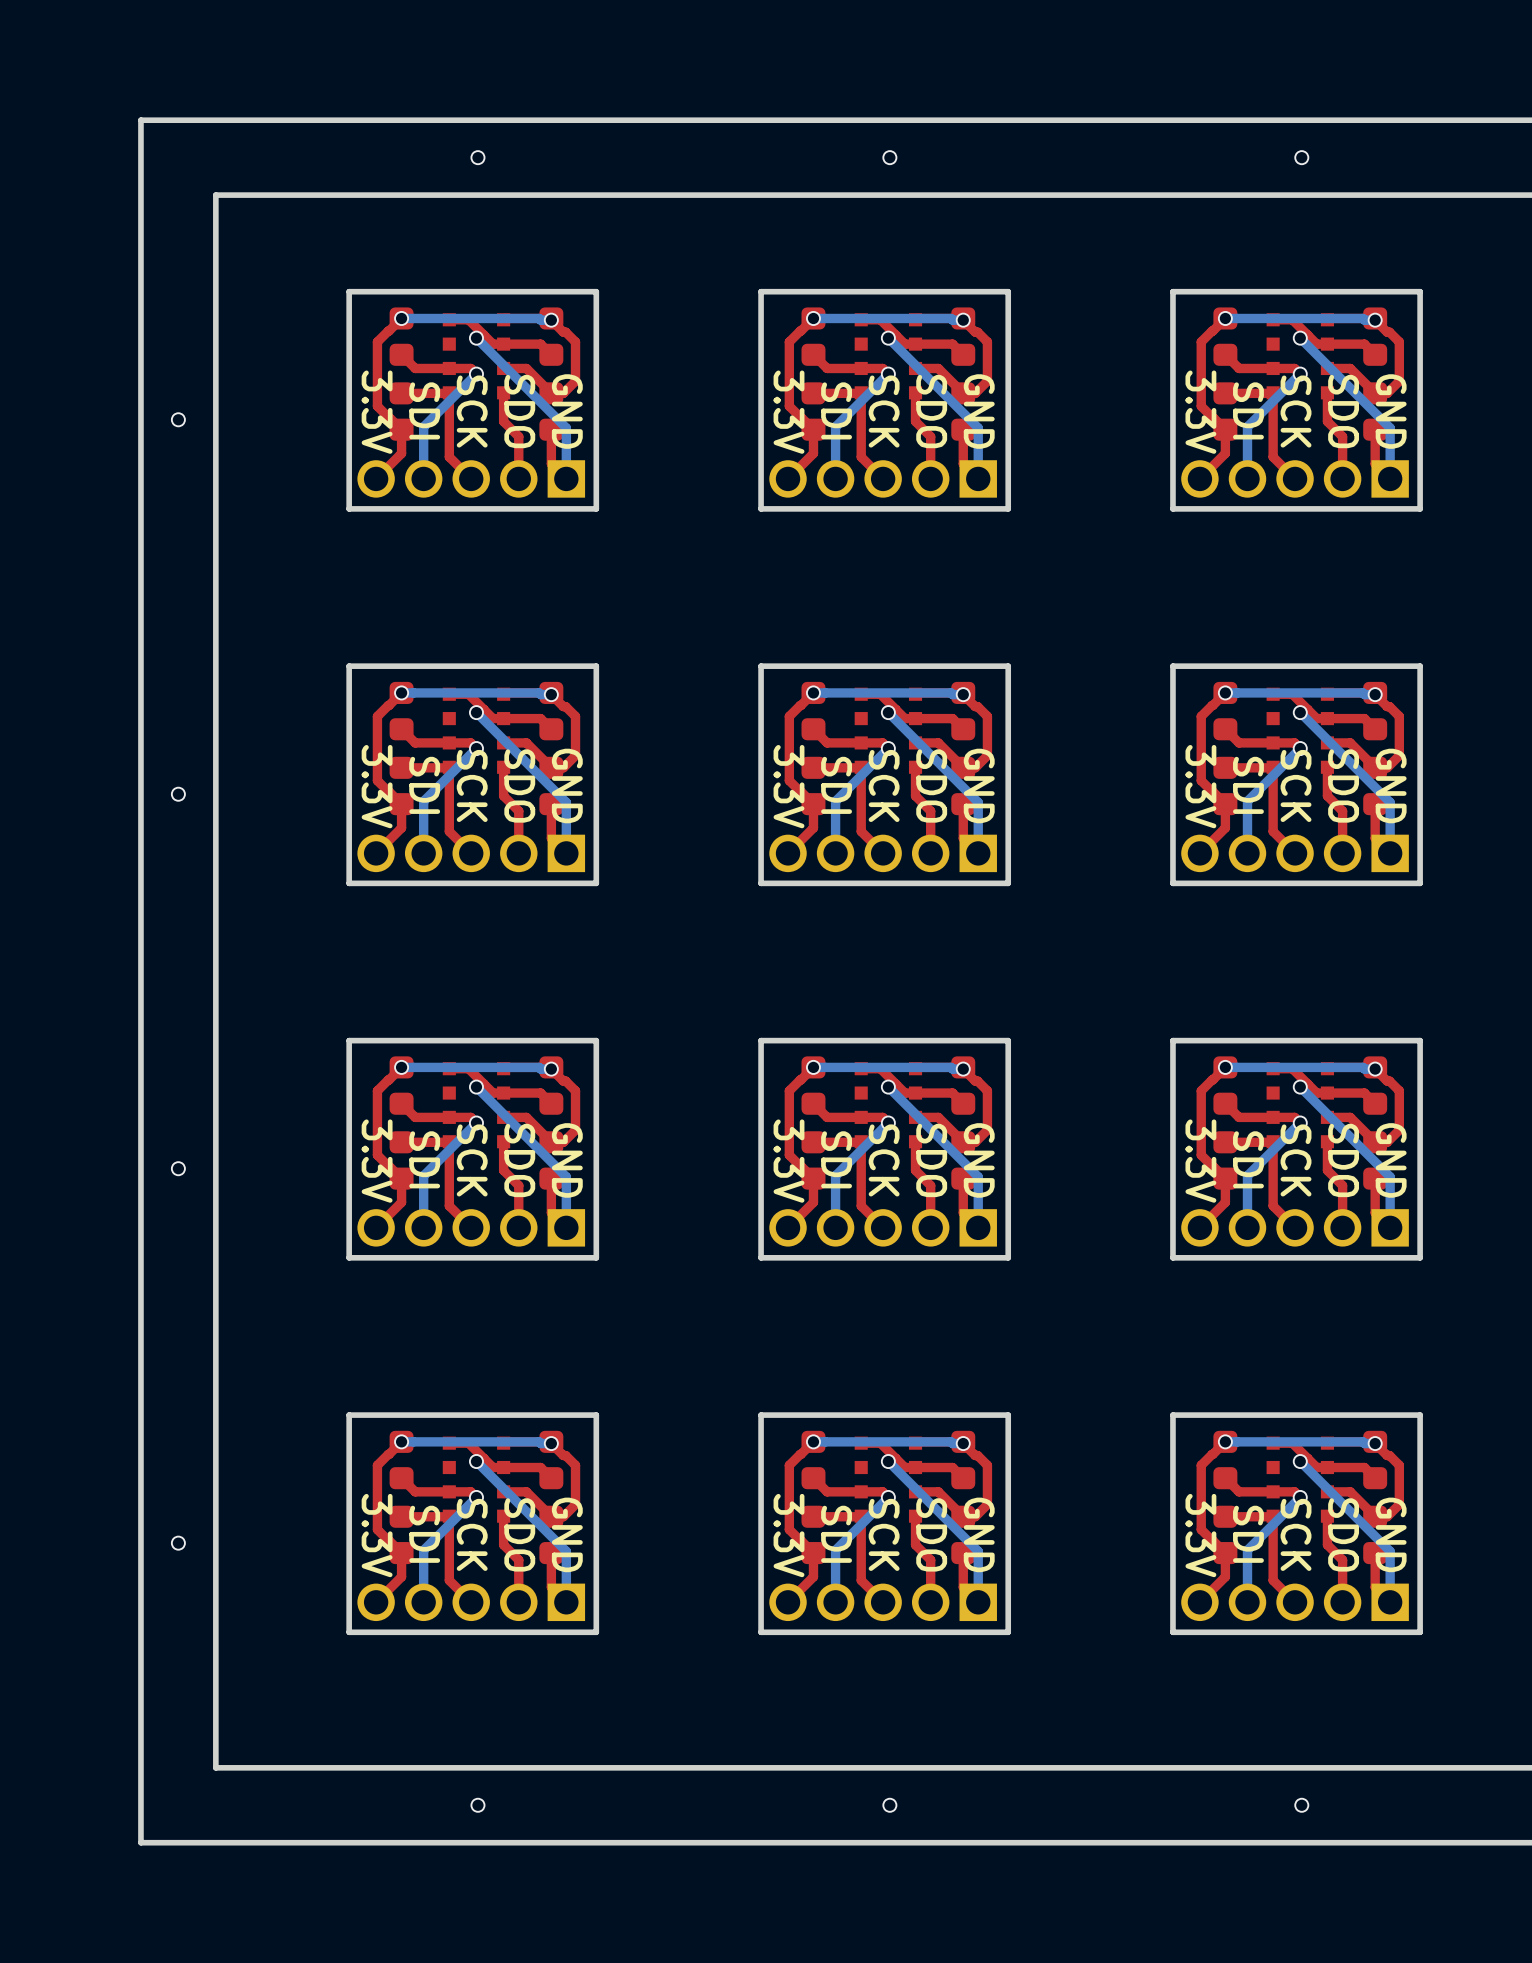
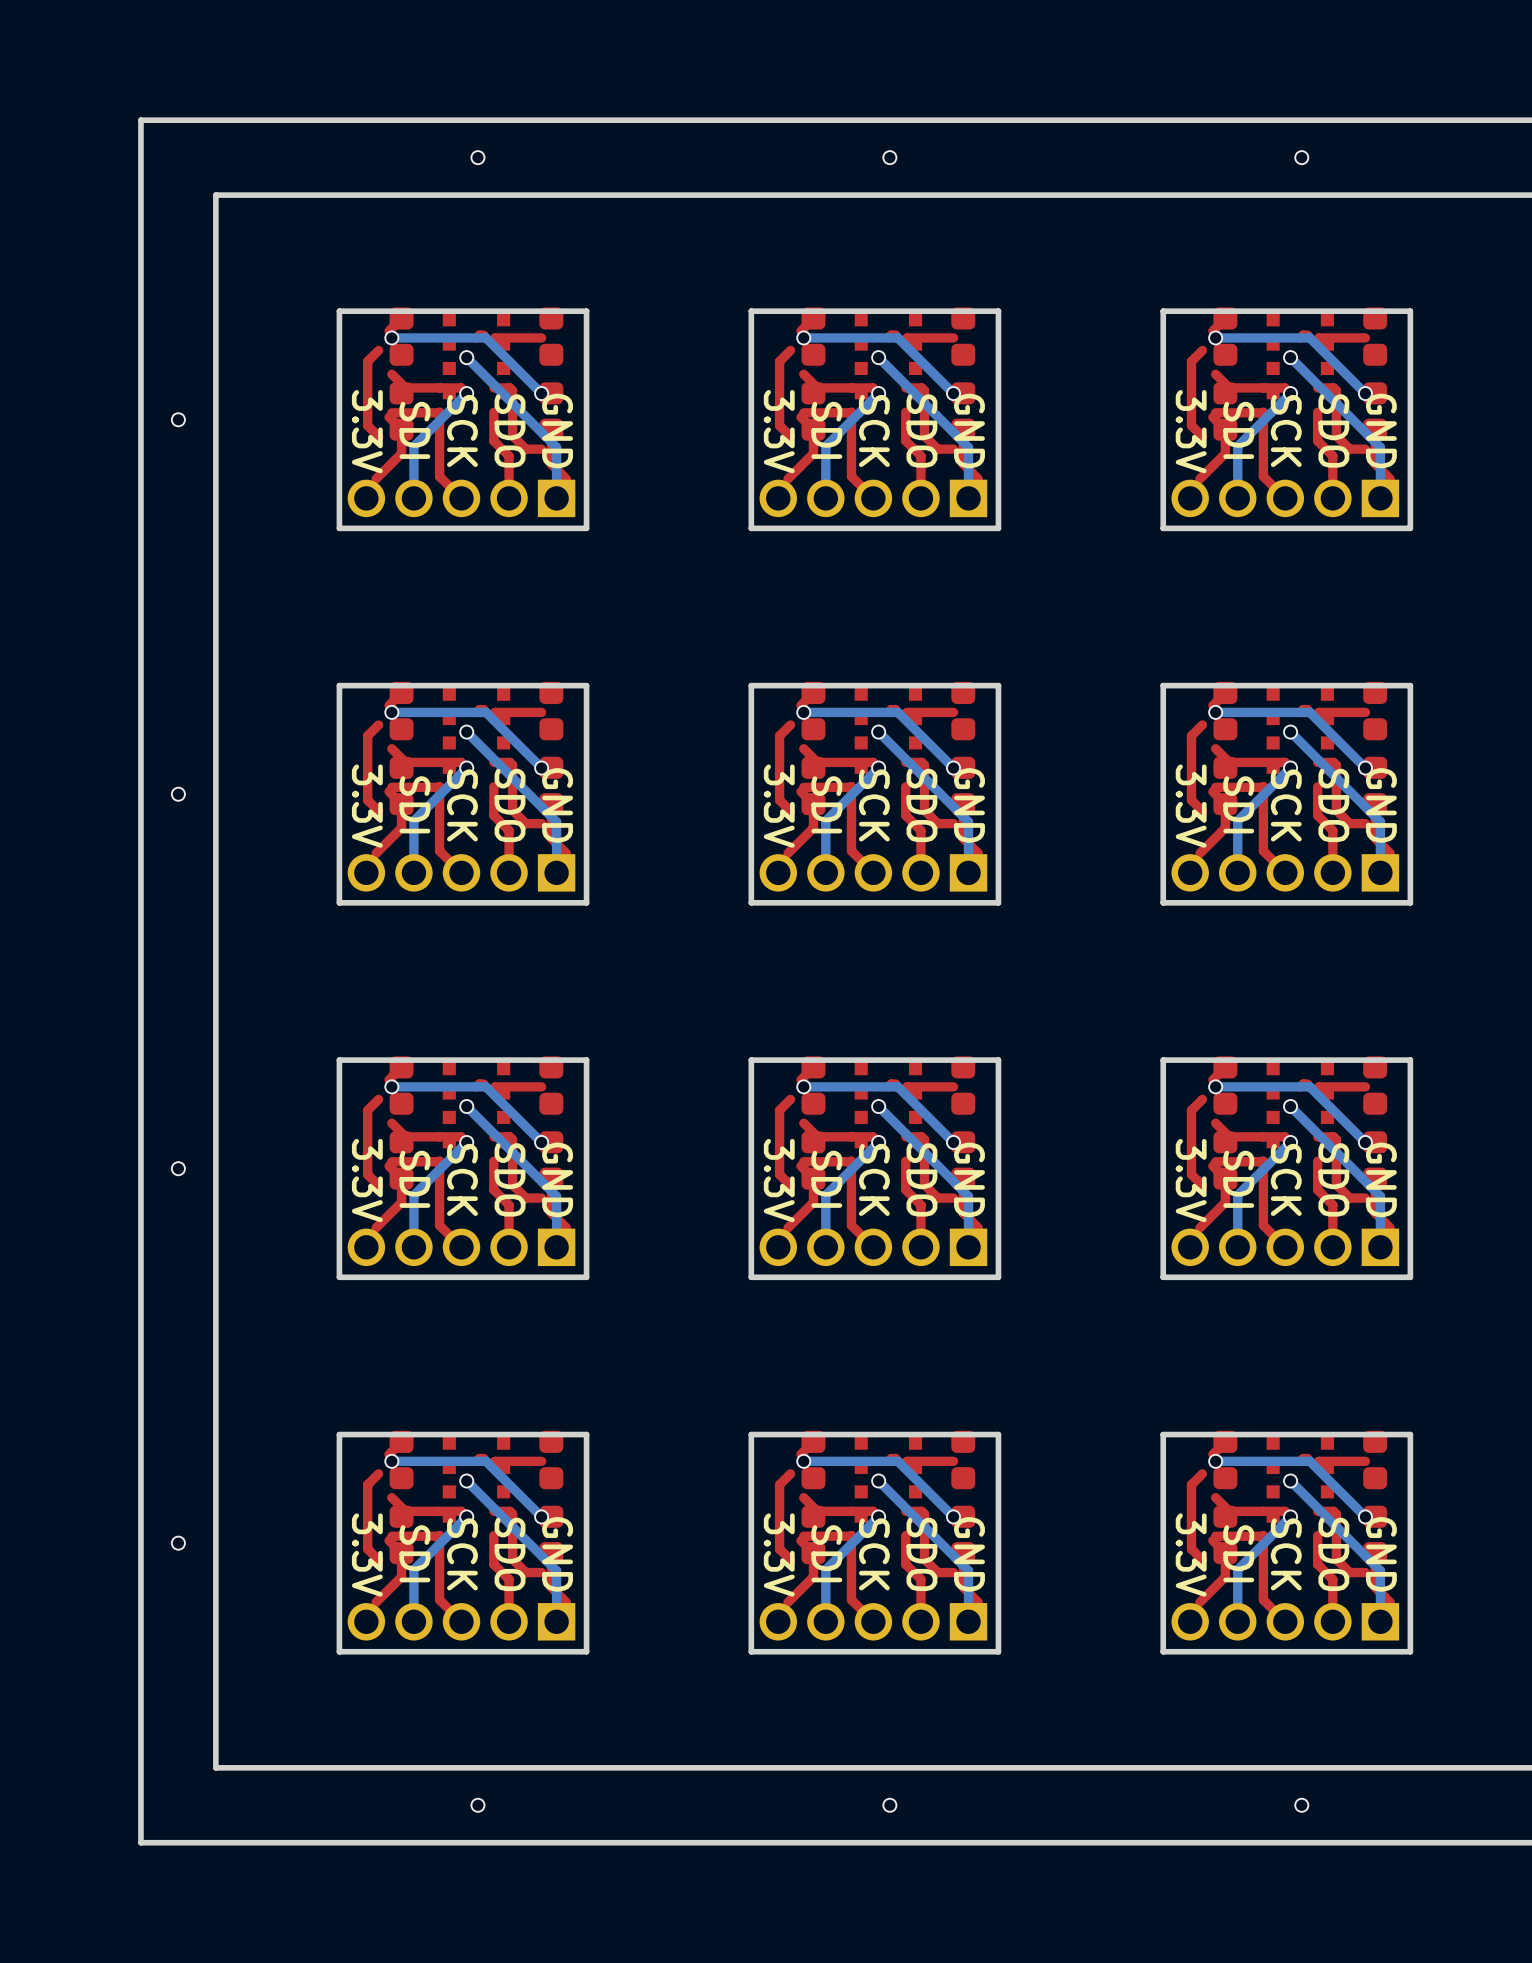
board edge: (596, 291) (349, 291) (349, 508) (596, 508) (596, 291) -> (586, 311) (339, 311) (339, 528) (586, 528) (586, 311)
board edge: (1008, 291) (761, 291) (761, 508) (1008, 508) (1008, 291) -> (998, 311) (751, 311) (751, 528) (998, 528) (998, 311)
board edge: (1420, 291) (1172, 291) (1172, 508) (1420, 508) (1420, 291) -> (1410, 311) (1163, 311) (1163, 528) (1410, 528) (1410, 311)
bottom track: (401, 318) (539, 318) (551, 320) -> none
via position: (401, 318) -> (391, 337)
bottom track: (813, 318) (950, 318) (963, 320) -> none
via position: (813, 318) -> (803, 337)
bottom track: (1225, 318) (1362, 318) (1375, 320) -> none
via position: (1225, 318) -> (1215, 337)
top track: (449, 319) (468, 319) (492, 344) (540, 344) (551, 354) -> none
top track: (503, 319) (551, 318) (575, 341) (575, 381) (563, 393) (551, 393) (526, 368) (503, 368) -> none
top track: (861, 319) (880, 319) (904, 344) (952, 344) (963, 354) -> none
top track: (915, 319) (963, 318) (987, 341) (987, 381) (975, 393) (963, 393) (938, 368) (915, 368) -> none
top track: (1273, 319) (1292, 319) (1316, 344) (1364, 344) (1375, 354) -> none
top track: (1327, 319) (1375, 318) (1399, 341) (1399, 381) (1387, 393) (1375, 393) (1350, 368) (1327, 368) -> none
via: (551, 320) -> none
via: (963, 320) -> none
via: (1375, 320) -> none
top track: (388, 330) (377, 341) (377, 406) (388, 417) -> (378, 350) (367, 361) (367, 425) (378, 436)
top track: (800, 330) (789, 341) (789, 406) (800, 417) -> (790, 350) (779, 361) (779, 425) (790, 436)
top track: (1212, 330) (1201, 341) (1201, 406) (1212, 417) -> (1202, 350) (1191, 361) (1191, 425) (1202, 436)
bottom track: none -> (391, 337) (486, 337) (541, 393)
top track: none -> (541, 337) (493, 339)
bottom track: none -> (803, 337) (897, 337) (953, 393)
top track: none -> (953, 337) (905, 339)
bottom track: none -> (1215, 337) (1309, 337) (1365, 393)
top track: none -> (1365, 337) (1317, 339)
bottom track: (476, 338) (566, 428) (566, 478) -> (466, 357) (556, 447) (556, 498)
via: (476, 338) -> none
bottom track: (888, 338) (978, 428) (978, 478) -> (878, 357) (968, 447) (968, 498)
via: (888, 338) -> none
bottom track: (1300, 338) (1390, 428) (1390, 478) -> (1290, 357) (1380, 447) (1380, 498)
via: (1300, 338) -> none
top track: (401, 354) (415, 368) (470, 368) (476, 374) -> (391, 374) (405, 387) (461, 387) (466, 393)
top track: (813, 354) (827, 368) (882, 368) (888, 374) -> (803, 374) (817, 387) (873, 387) (878, 393)
top track: (1225, 354) (1239, 368) (1294, 368) (1300, 374) -> (1215, 374) (1229, 387) (1284, 387) (1290, 393)
via: none -> (466, 357)
via: none -> (878, 357)
via: none -> (1290, 357)
bottom track: (476, 374) (423, 426) (423, 478) -> (466, 393) (413, 446) (413, 498)
via: (476, 374) -> none
bottom track: (888, 374) (835, 426) (835, 478) -> (878, 393) (825, 446) (825, 498)
via: (888, 374) -> none
bottom track: (1300, 374) (1247, 426) (1247, 478) -> (1290, 393) (1237, 446) (1237, 498)
via: (1300, 374) -> none
top track: none -> (493, 387) (509, 387) (512, 390) (512, 435) (525, 449) (541, 449)
top track: none -> (905, 387) (921, 387) (924, 390) (924, 435) (937, 449) (953, 449)
top track: none -> (1317, 387) (1333, 387) (1336, 390) (1336, 435) (1349, 449) (1365, 449)
top track: (503, 392) (503, 421) (518, 436) (518, 478) -> (493, 412) (493, 440) (509, 456) (509, 498)
top track: (915, 392) (915, 421) (930, 436) (930, 478) -> (905, 412) (905, 440) (920, 456) (920, 498)
top track: (1327, 392) (1327, 421) (1342, 436) (1342, 478) -> (1317, 412) (1317, 440) (1332, 456) (1332, 498)
top track: (401, 393) (449, 392) (449, 457) (471, 478) -> (391, 412) (439, 412) (439, 476) (461, 498)
via: none -> (466, 393)
via: none -> (541, 393)
top track: (813, 393) (861, 392) (861, 457) (883, 478) -> (803, 412) (851, 412) (851, 476) (873, 498)
via: none -> (878, 393)
via: none -> (953, 393)
top track: (1225, 393) (1273, 392) (1273, 457) (1295, 478) -> (1215, 412) (1263, 412) (1263, 476) (1285, 498)
via: none -> (1290, 393)
via: none -> (1365, 393)
text position: SDI (424, 410) -> SDI (414, 430)
text position: SDI (836, 410) -> SDI (826, 430)
text position: SDI (1248, 410) -> SDI (1238, 430)
text position: SCK (472, 411) -> SCK (462, 431)
text position: SDO (519, 411) -> SDO (510, 431)
text position: GND (567, 411) -> GND (557, 431)
text position: SCK (884, 411) -> SCK (874, 431)
text position: SDO (931, 411) -> SDO (921, 431)
text position: GND (979, 411) -> GND (969, 431)
text position: SCK (1296, 411) -> SCK (1286, 431)
text position: SDO (1343, 411) -> SDO (1333, 431)
text position: GND (1391, 411) -> GND (1381, 431)
text position: 3.3V (377, 412) -> 3.3V (367, 431)
text position: 3.3V (789, 412) -> 3.3V (779, 431)
text position: 3.3V (1200, 412) -> 3.3V (1191, 431)
part position: (471, 478) -> (461, 498)
part position: (883, 478) -> (873, 498)
part position: (1295, 478) -> (1285, 498)
board edge: (596, 666) (349, 666) (349, 883) (596, 883) (596, 666) -> (586, 685) (339, 685) (339, 902) (586, 902) (586, 685)
board edge: (1008, 666) (761, 666) (761, 883) (1008, 883) (1008, 666) -> (998, 685) (751, 685) (751, 902) (998, 902) (998, 685)
board edge: (1420, 666) (1172, 666) (1172, 883) (1420, 883) (1420, 666) -> (1410, 685) (1163, 685) (1163, 902) (1410, 902) (1410, 685)
bottom track: (401, 692) (539, 692) (551, 694) -> none
via position: (401, 692) -> (391, 712)
bottom track: (813, 692) (950, 692) (963, 694) -> none
via position: (813, 692) -> (803, 712)
bottom track: (1225, 692) (1362, 692) (1375, 694) -> none
via position: (1225, 692) -> (1215, 712)
top track: (449, 694) (468, 694) (492, 718) (540, 718) (551, 729) -> none
top track: (503, 694) (551, 692) (575, 716) (575, 755) (563, 767) (551, 767) (526, 742) (503, 742) -> none
via: (551, 694) -> none
top track: (861, 694) (880, 694) (904, 718) (952, 718) (963, 729) -> none
top track: (915, 694) (963, 692) (987, 716) (987, 755) (975, 767) (963, 767) (938, 742) (915, 742) -> none
via: (963, 694) -> none
top track: (1273, 694) (1292, 694) (1316, 718) (1364, 718) (1375, 729) -> none
top track: (1327, 694) (1375, 692) (1399, 716) (1399, 755) (1387, 767) (1375, 767) (1350, 742) (1327, 742) -> none
via: (1375, 694) -> none
top track: (388, 705) (377, 716) (377, 780) (388, 791) -> (378, 724) (367, 735) (367, 800) (378, 811)
top track: (800, 705) (789, 716) (789, 780) (800, 791) -> (790, 724) (779, 735) (779, 800) (790, 811)
top track: (1212, 705) (1201, 716) (1201, 780) (1212, 791) -> (1202, 724) (1191, 735) (1191, 800) (1202, 811)
bottom track: none -> (391, 712) (486, 712) (541, 768)
bottom track: (476, 712) (566, 802) (566, 853) -> (466, 732) (556, 821) (556, 872)
via: (476, 712) -> none
top track: none -> (541, 712) (493, 713)
bottom track: none -> (803, 712) (897, 712) (953, 768)
bottom track: (888, 712) (978, 802) (978, 853) -> (878, 732) (968, 821) (968, 872)
via: (888, 712) -> none
top track: none -> (953, 712) (905, 713)
bottom track: none -> (1215, 712) (1309, 712) (1365, 768)
bottom track: (1300, 712) (1390, 802) (1390, 853) -> (1290, 732) (1380, 821) (1380, 872)
via: (1300, 712) -> none
top track: none -> (1365, 712) (1317, 713)
top track: (401, 729) (415, 742) (470, 742) (476, 748) -> (391, 748) (405, 762) (461, 762) (466, 768)
top track: (813, 729) (827, 742) (882, 742) (888, 748) -> (803, 748) (817, 762) (873, 762) (878, 768)
top track: (1225, 729) (1239, 742) (1294, 742) (1300, 748) -> (1215, 748) (1229, 762) (1284, 762) (1290, 768)
via: none -> (466, 732)
via: none -> (878, 732)
via: none -> (1290, 732)
bottom track: (476, 748) (423, 801) (423, 853) -> (466, 768) (413, 820) (413, 872)
via: (476, 748) -> none
bottom track: (888, 748) (835, 801) (835, 853) -> (878, 768) (825, 820) (825, 872)
via: (888, 748) -> none
bottom track: (1300, 748) (1247, 801) (1247, 853) -> (1290, 768) (1237, 820) (1237, 872)
via: (1300, 748) -> none
top track: none -> (493, 762) (509, 762) (512, 765) (512, 810) (525, 823) (541, 823)
top track: none -> (905, 762) (921, 762) (924, 765) (924, 810) (937, 823) (953, 823)
top track: none -> (1317, 762) (1333, 762) (1336, 765) (1336, 810) (1349, 823) (1365, 823)
top track: (401, 767) (449, 767) (449, 831) (471, 853) -> (391, 787) (439, 786) (439, 850) (461, 872)
top track: (503, 767) (503, 795) (518, 811) (518, 853) -> (493, 786) (493, 815) (509, 830) (509, 872)
top track: (813, 767) (861, 767) (861, 831) (883, 853) -> (803, 787) (851, 786) (851, 850) (873, 872)
top track: (915, 767) (915, 795) (930, 811) (930, 853) -> (905, 786) (905, 815) (920, 830) (920, 872)
top track: (1225, 767) (1273, 767) (1273, 831) (1295, 853) -> (1215, 787) (1263, 786) (1263, 850) (1285, 872)
top track: (1327, 767) (1327, 795) (1342, 811) (1342, 853) -> (1317, 786) (1317, 815) (1332, 830) (1332, 872)
via: none -> (466, 768)
via: none -> (541, 768)
via: none -> (878, 768)
via: none -> (953, 768)
via: none -> (1290, 768)
via: none -> (1365, 768)
text position: SDI (424, 785) -> SDI (414, 804)
text position: SCK (472, 785) -> SCK (462, 805)
text position: SDO (519, 785) -> SDO (510, 805)
text position: GND (567, 785) -> GND (557, 805)
text position: SDI (836, 785) -> SDI (826, 804)
text position: SCK (884, 785) -> SCK (874, 805)
text position: SDO (931, 785) -> SDO (921, 805)
text position: GND (979, 785) -> GND (969, 805)
text position: SDI (1248, 785) -> SDI (1238, 804)
text position: SCK (1296, 785) -> SCK (1286, 805)
text position: SDO (1343, 785) -> SDO (1333, 805)
text position: GND (1391, 785) -> GND (1381, 805)
text position: 3.3V (377, 786) -> 3.3V (367, 806)
text position: 3.3V (789, 786) -> 3.3V (779, 806)
text position: 3.3V (1200, 786) -> 3.3V (1191, 806)
part position: (471, 853) -> (461, 872)
part position: (883, 853) -> (873, 872)
part position: (1295, 853) -> (1285, 872)
board edge: (596, 1040) (349, 1040) (349, 1257) (596, 1257) (596, 1040) -> (586, 1060) (339, 1060) (339, 1277) (586, 1277) (586, 1060)
board edge: (1008, 1040) (761, 1040) (761, 1257) (1008, 1257) (1008, 1040) -> (998, 1060) (751, 1060) (751, 1277) (998, 1277) (998, 1060)
board edge: (1420, 1040) (1172, 1040) (1172, 1257) (1420, 1257) (1420, 1040) -> (1410, 1060) (1163, 1060) (1163, 1277) (1410, 1277) (1410, 1060)
bottom track: (401, 1067) (539, 1067) (551, 1069) -> none
via position: (401, 1067) -> (391, 1086)
bottom track: (813, 1067) (950, 1067) (963, 1069) -> none
via position: (813, 1067) -> (803, 1086)
bottom track: (1225, 1067) (1362, 1067) (1375, 1069) -> none
via position: (1225, 1067) -> (1215, 1086)
top track: (449, 1068) (468, 1068) (492, 1093) (540, 1093) (551, 1103) -> none
top track: (503, 1068) (551, 1067) (575, 1090) (575, 1130) (563, 1142) (551, 1142) (526, 1117) (503, 1117) -> none
top track: (861, 1068) (880, 1068) (904, 1093) (952, 1093) (963, 1103) -> none
top track: (915, 1068) (963, 1067) (987, 1090) (987, 1130) (975, 1142) (963, 1142) (938, 1117) (915, 1117) -> none
top track: (1273, 1068) (1292, 1068) (1316, 1093) (1364, 1093) (1375, 1103) -> none
top track: (1327, 1068) (1375, 1067) (1399, 1090) (1399, 1130) (1387, 1142) (1375, 1142) (1350, 1117) (1327, 1117) -> none
via: (551, 1069) -> none
via: (963, 1069) -> none
via: (1375, 1069) -> none
top track: (388, 1079) (377, 1090) (377, 1155) (388, 1166) -> (378, 1099) (367, 1110) (367, 1174) (378, 1185)
top track: (800, 1079) (789, 1090) (789, 1155) (800, 1166) -> (790, 1099) (779, 1110) (779, 1174) (790, 1185)
top track: (1212, 1079) (1201, 1090) (1201, 1155) (1212, 1166) -> (1202, 1099) (1191, 1110) (1191, 1174) (1202, 1185)
bottom track: none -> (391, 1086) (486, 1086) (541, 1142)
top track: none -> (541, 1086) (493, 1088)
bottom track: none -> (803, 1086) (897, 1086) (953, 1142)
top track: none -> (953, 1086) (905, 1088)
bottom track: none -> (1215, 1086) (1309, 1086) (1365, 1142)
top track: none -> (1365, 1086) (1317, 1088)
bottom track: (476, 1087) (566, 1176) (566, 1227) -> (466, 1106) (556, 1196) (556, 1247)
via: (476, 1087) -> none
bottom track: (888, 1087) (978, 1176) (978, 1227) -> (878, 1106) (968, 1196) (968, 1247)
via: (888, 1087) -> none
bottom track: (1300, 1087) (1390, 1176) (1390, 1227) -> (1290, 1106) (1380, 1196) (1380, 1247)
via: (1300, 1087) -> none
top track: (401, 1103) (415, 1117) (470, 1117) (476, 1123) -> (391, 1123) (405, 1136) (461, 1136) (466, 1142)
top track: (813, 1103) (827, 1117) (882, 1117) (888, 1123) -> (803, 1123) (817, 1136) (873, 1136) (878, 1142)
top track: (1225, 1103) (1239, 1117) (1294, 1117) (1300, 1123) -> (1215, 1123) (1229, 1136) (1284, 1136) (1290, 1142)
via: none -> (466, 1106)
via: none -> (878, 1106)
via: none -> (1290, 1106)
bottom track: (476, 1123) (423, 1175) (423, 1227) -> (466, 1142) (413, 1195) (413, 1247)
via: (476, 1123) -> none
bottom track: (888, 1123) (835, 1175) (835, 1227) -> (878, 1142) (825, 1195) (825, 1247)
via: (888, 1123) -> none
bottom track: (1300, 1123) (1247, 1175) (1247, 1227) -> (1290, 1142) (1237, 1195) (1237, 1247)
via: (1300, 1123) -> none
top track: none -> (493, 1136) (509, 1136) (512, 1139) (512, 1184) (525, 1198) (541, 1198)
top track: none -> (905, 1136) (921, 1136) (924, 1139) (924, 1184) (937, 1198) (953, 1198)
top track: none -> (1317, 1136) (1333, 1136) (1336, 1139) (1336, 1184) (1349, 1198) (1365, 1198)
top track: (503, 1141) (503, 1170) (518, 1185) (518, 1227) -> (493, 1161) (493, 1189) (509, 1205) (509, 1247)
top track: (915, 1141) (915, 1170) (930, 1185) (930, 1227) -> (905, 1161) (905, 1189) (920, 1205) (920, 1247)
top track: (1327, 1141) (1327, 1170) (1342, 1185) (1342, 1227) -> (1317, 1161) (1317, 1189) (1332, 1205) (1332, 1247)
top track: (401, 1142) (449, 1141) (449, 1205) (471, 1227) -> (391, 1161) (439, 1161) (439, 1225) (461, 1247)
via: none -> (466, 1142)
via: none -> (541, 1142)
top track: (813, 1142) (861, 1141) (861, 1205) (883, 1227) -> (803, 1161) (851, 1161) (851, 1225) (873, 1247)
via: none -> (878, 1142)
via: none -> (953, 1142)
top track: (1225, 1142) (1273, 1141) (1273, 1205) (1295, 1227) -> (1215, 1161) (1263, 1161) (1263, 1225) (1285, 1247)
via: none -> (1290, 1142)
via: none -> (1365, 1142)
text position: SDI (424, 1159) -> SDI (414, 1179)
text position: SDI (836, 1159) -> SDI (826, 1179)
text position: SDI (1248, 1159) -> SDI (1238, 1179)
text position: SCK (472, 1160) -> SCK (462, 1179)
text position: SDO (519, 1160) -> SDO (510, 1179)
text position: GND (567, 1160) -> GND (557, 1179)
text position: SCK (884, 1160) -> SCK (874, 1179)
text position: SDO (931, 1160) -> SDO (921, 1179)
text position: GND (979, 1160) -> GND (969, 1179)
text position: SCK (1296, 1160) -> SCK (1286, 1179)
text position: SDO (1343, 1160) -> SDO (1333, 1179)
text position: GND (1391, 1160) -> GND (1381, 1179)
text position: 3.3V (377, 1161) -> 3.3V (367, 1180)
text position: 3.3V (789, 1161) -> 3.3V (779, 1180)
text position: 3.3V (1200, 1161) -> 3.3V (1191, 1180)
part position: (471, 1227) -> (461, 1247)
part position: (883, 1227) -> (873, 1247)
part position: (1295, 1227) -> (1285, 1247)
board edge: (596, 1415) (349, 1415) (349, 1632) (596, 1632) (596, 1415) -> (586, 1434) (339, 1434) (339, 1651) (586, 1651) (586, 1434)
board edge: (1008, 1415) (761, 1415) (761, 1632) (1008, 1632) (1008, 1415) -> (998, 1434) (751, 1434) (751, 1651) (998, 1651) (998, 1434)
board edge: (1420, 1415) (1172, 1415) (1172, 1632) (1420, 1632) (1420, 1415) -> (1410, 1434) (1163, 1434) (1163, 1651) (1410, 1651) (1410, 1434)
bottom track: (401, 1441) (539, 1441) (551, 1443) -> none
via position: (401, 1441) -> (391, 1461)
bottom track: (813, 1441) (950, 1441) (963, 1443) -> none
via position: (813, 1441) -> (803, 1461)
bottom track: (1225, 1441) (1362, 1441) (1375, 1443) -> none
via position: (1225, 1441) -> (1215, 1461)
top track: (449, 1443) (468, 1443) (492, 1467) (540, 1467) (551, 1478) -> none
top track: (503, 1443) (551, 1441) (575, 1465) (575, 1504) (563, 1516) (551, 1516) (526, 1491) (503, 1491) -> none
via: (551, 1443) -> none
top track: (861, 1443) (880, 1443) (904, 1467) (952, 1467) (963, 1478) -> none
top track: (915, 1443) (963, 1441) (987, 1465) (987, 1504) (975, 1516) (963, 1516) (938, 1491) (915, 1491) -> none
via: (963, 1443) -> none
top track: (1273, 1443) (1292, 1443) (1316, 1467) (1364, 1467) (1375, 1478) -> none
top track: (1327, 1443) (1375, 1441) (1399, 1465) (1399, 1504) (1387, 1516) (1375, 1516) (1350, 1491) (1327, 1491) -> none
via: (1375, 1443) -> none
top track: (388, 1454) (377, 1465) (377, 1529) (388, 1540) -> (378, 1473) (367, 1484) (367, 1549) (378, 1560)
top track: (800, 1454) (789, 1465) (789, 1529) (800, 1540) -> (790, 1473) (779, 1484) (779, 1549) (790, 1560)
top track: (1212, 1454) (1201, 1465) (1201, 1529) (1212, 1540) -> (1202, 1473) (1191, 1484) (1191, 1549) (1202, 1560)
bottom track: none -> (391, 1461) (486, 1461) (541, 1516)
bottom track: (476, 1461) (566, 1551) (566, 1602) -> (466, 1480) (556, 1570) (556, 1621)
via: (476, 1461) -> none
top track: none -> (541, 1461) (493, 1462)
bottom track: none -> (803, 1461) (897, 1461) (953, 1516)
bottom track: (888, 1461) (978, 1551) (978, 1602) -> (878, 1480) (968, 1570) (968, 1621)
via: (888, 1461) -> none
top track: none -> (953, 1461) (905, 1462)
bottom track: none -> (1215, 1461) (1309, 1461) (1365, 1516)
bottom track: (1300, 1461) (1390, 1551) (1390, 1602) -> (1290, 1480) (1380, 1570) (1380, 1621)
via: (1300, 1461) -> none
top track: none -> (1365, 1461) (1317, 1462)
top track: (401, 1478) (415, 1491) (470, 1491) (476, 1497) -> (391, 1497) (405, 1511) (461, 1511) (466, 1516)
top track: (813, 1478) (827, 1491) (882, 1491) (888, 1497) -> (803, 1497) (817, 1511) (873, 1511) (878, 1516)
top track: (1225, 1478) (1239, 1491) (1294, 1491) (1300, 1497) -> (1215, 1497) (1229, 1511) (1284, 1511) (1290, 1516)
via: none -> (466, 1480)
via: none -> (878, 1480)
via: none -> (1290, 1480)
bottom track: (476, 1497) (423, 1550) (423, 1602) -> (466, 1516) (413, 1569) (413, 1621)
via: (476, 1497) -> none
bottom track: (888, 1497) (835, 1550) (835, 1602) -> (878, 1516) (825, 1569) (825, 1621)
via: (888, 1497) -> none
bottom track: (1300, 1497) (1247, 1550) (1247, 1602) -> (1290, 1516) (1237, 1569) (1237, 1621)
via: (1300, 1497) -> none
top track: none -> (493, 1511) (509, 1511) (512, 1514) (512, 1559) (525, 1572) (541, 1572)
top track: none -> (905, 1511) (921, 1511) (924, 1514) (924, 1559) (937, 1572) (953, 1572)
top track: none -> (1317, 1511) (1333, 1511) (1336, 1514) (1336, 1559) (1349, 1572) (1365, 1572)
top track: (401, 1516) (449, 1516) (449, 1580) (471, 1602) -> (391, 1536) (439, 1535) (439, 1599) (461, 1621)
via: none -> (466, 1516)
top track: (503, 1516) (503, 1544) (518, 1560) (518, 1602) -> (493, 1535) (493, 1564) (509, 1579) (509, 1621)
via: none -> (541, 1516)
top track: (813, 1516) (861, 1516) (861, 1580) (883, 1602) -> (803, 1536) (851, 1535) (851, 1599) (873, 1621)
via: none -> (878, 1516)
top track: (915, 1516) (915, 1544) (930, 1560) (930, 1602) -> (905, 1535) (905, 1564) (920, 1579) (920, 1621)
via: none -> (953, 1516)
top track: (1225, 1516) (1273, 1516) (1273, 1580) (1295, 1602) -> (1215, 1536) (1263, 1535) (1263, 1599) (1285, 1621)
via: none -> (1290, 1516)
top track: (1327, 1516) (1327, 1544) (1342, 1560) (1342, 1602) -> (1317, 1535) (1317, 1564) (1332, 1579) (1332, 1621)
via: none -> (1365, 1516)
text position: SDI (424, 1534) -> SDI (414, 1553)
text position: SCK (472, 1534) -> SCK (462, 1554)
text position: SDO (519, 1534) -> SDO (510, 1554)
text position: GND (567, 1534) -> GND (557, 1554)
text position: SDI (836, 1534) -> SDI (826, 1553)
text position: SCK (884, 1534) -> SCK (874, 1554)
text position: SDO (931, 1534) -> SDO (921, 1554)
text position: GND (979, 1534) -> GND (969, 1554)
text position: SDI (1248, 1534) -> SDI (1238, 1553)
text position: SCK (1296, 1534) -> SCK (1286, 1554)
text position: SDO (1343, 1534) -> SDO (1333, 1554)
text position: GND (1391, 1534) -> GND (1381, 1554)
text position: 3.3V (377, 1535) -> 3.3V (367, 1555)
text position: 3.3V (789, 1535) -> 3.3V (779, 1555)
text position: 3.3V (1200, 1535) -> 3.3V (1191, 1555)
part position: (471, 1602) -> (461, 1621)
part position: (883, 1602) -> (873, 1621)
part position: (1295, 1602) -> (1285, 1621)

